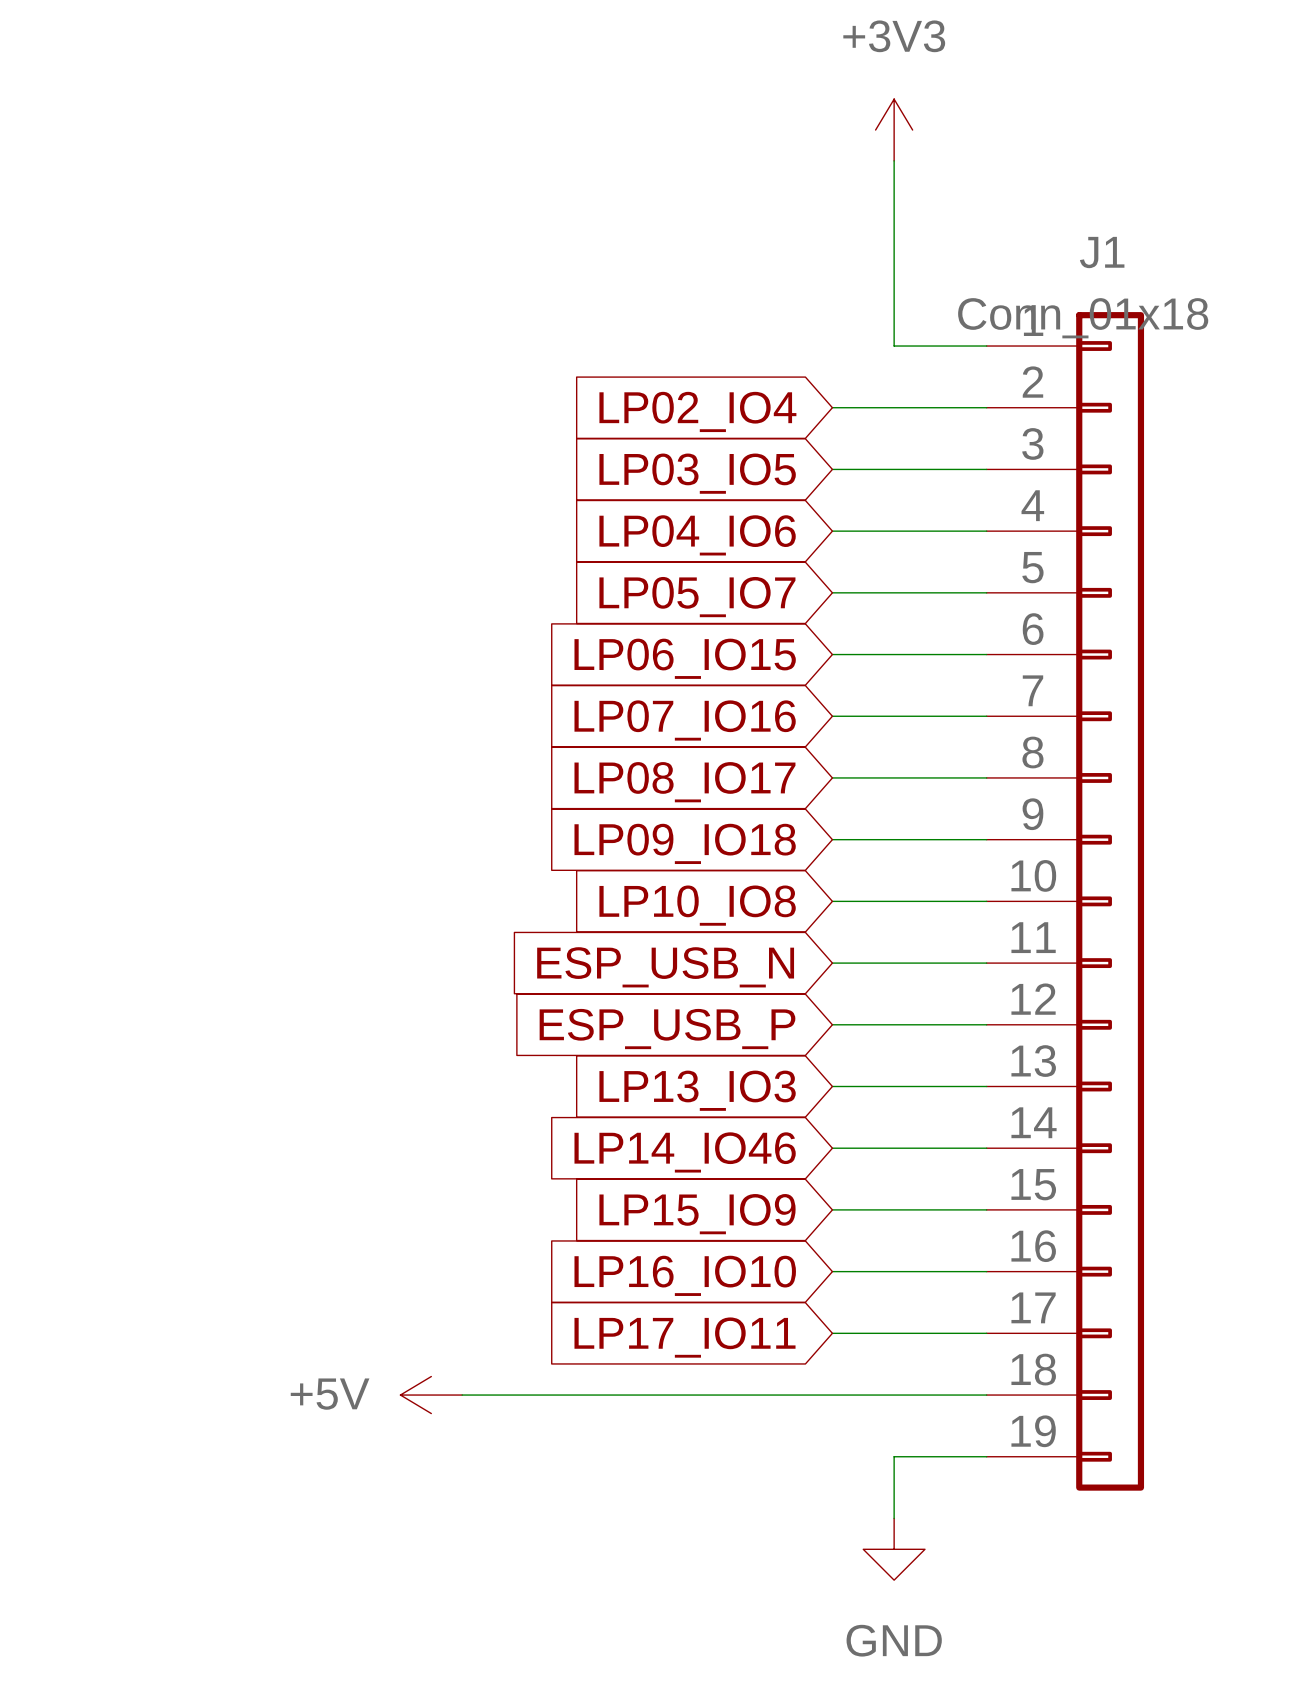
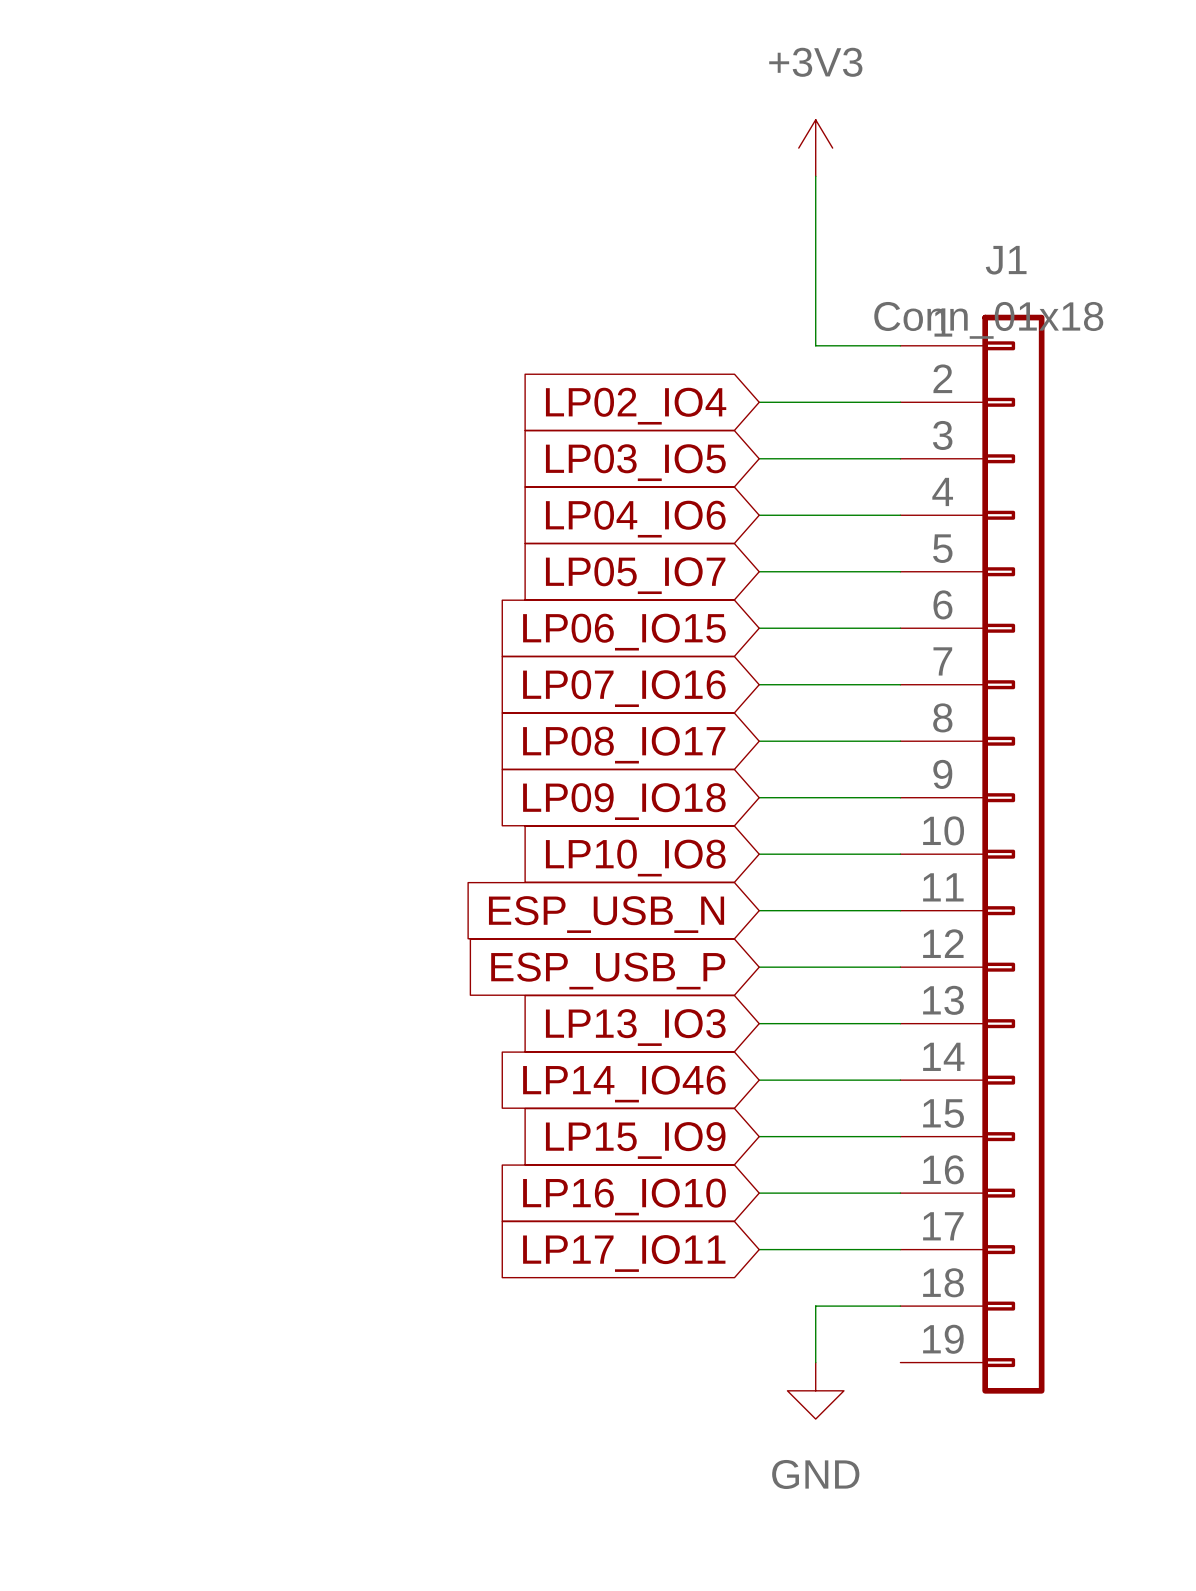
power symbol: +5V (431, 1395) -> none
wire: (462, 1395) (894, 1395) -> (815, 1362) (815, 1306)
wire: (986, 1456) (894, 1456) (894, 1518) -> none
power symbol position: GND (894, 1549) -> GND (815, 1390)

